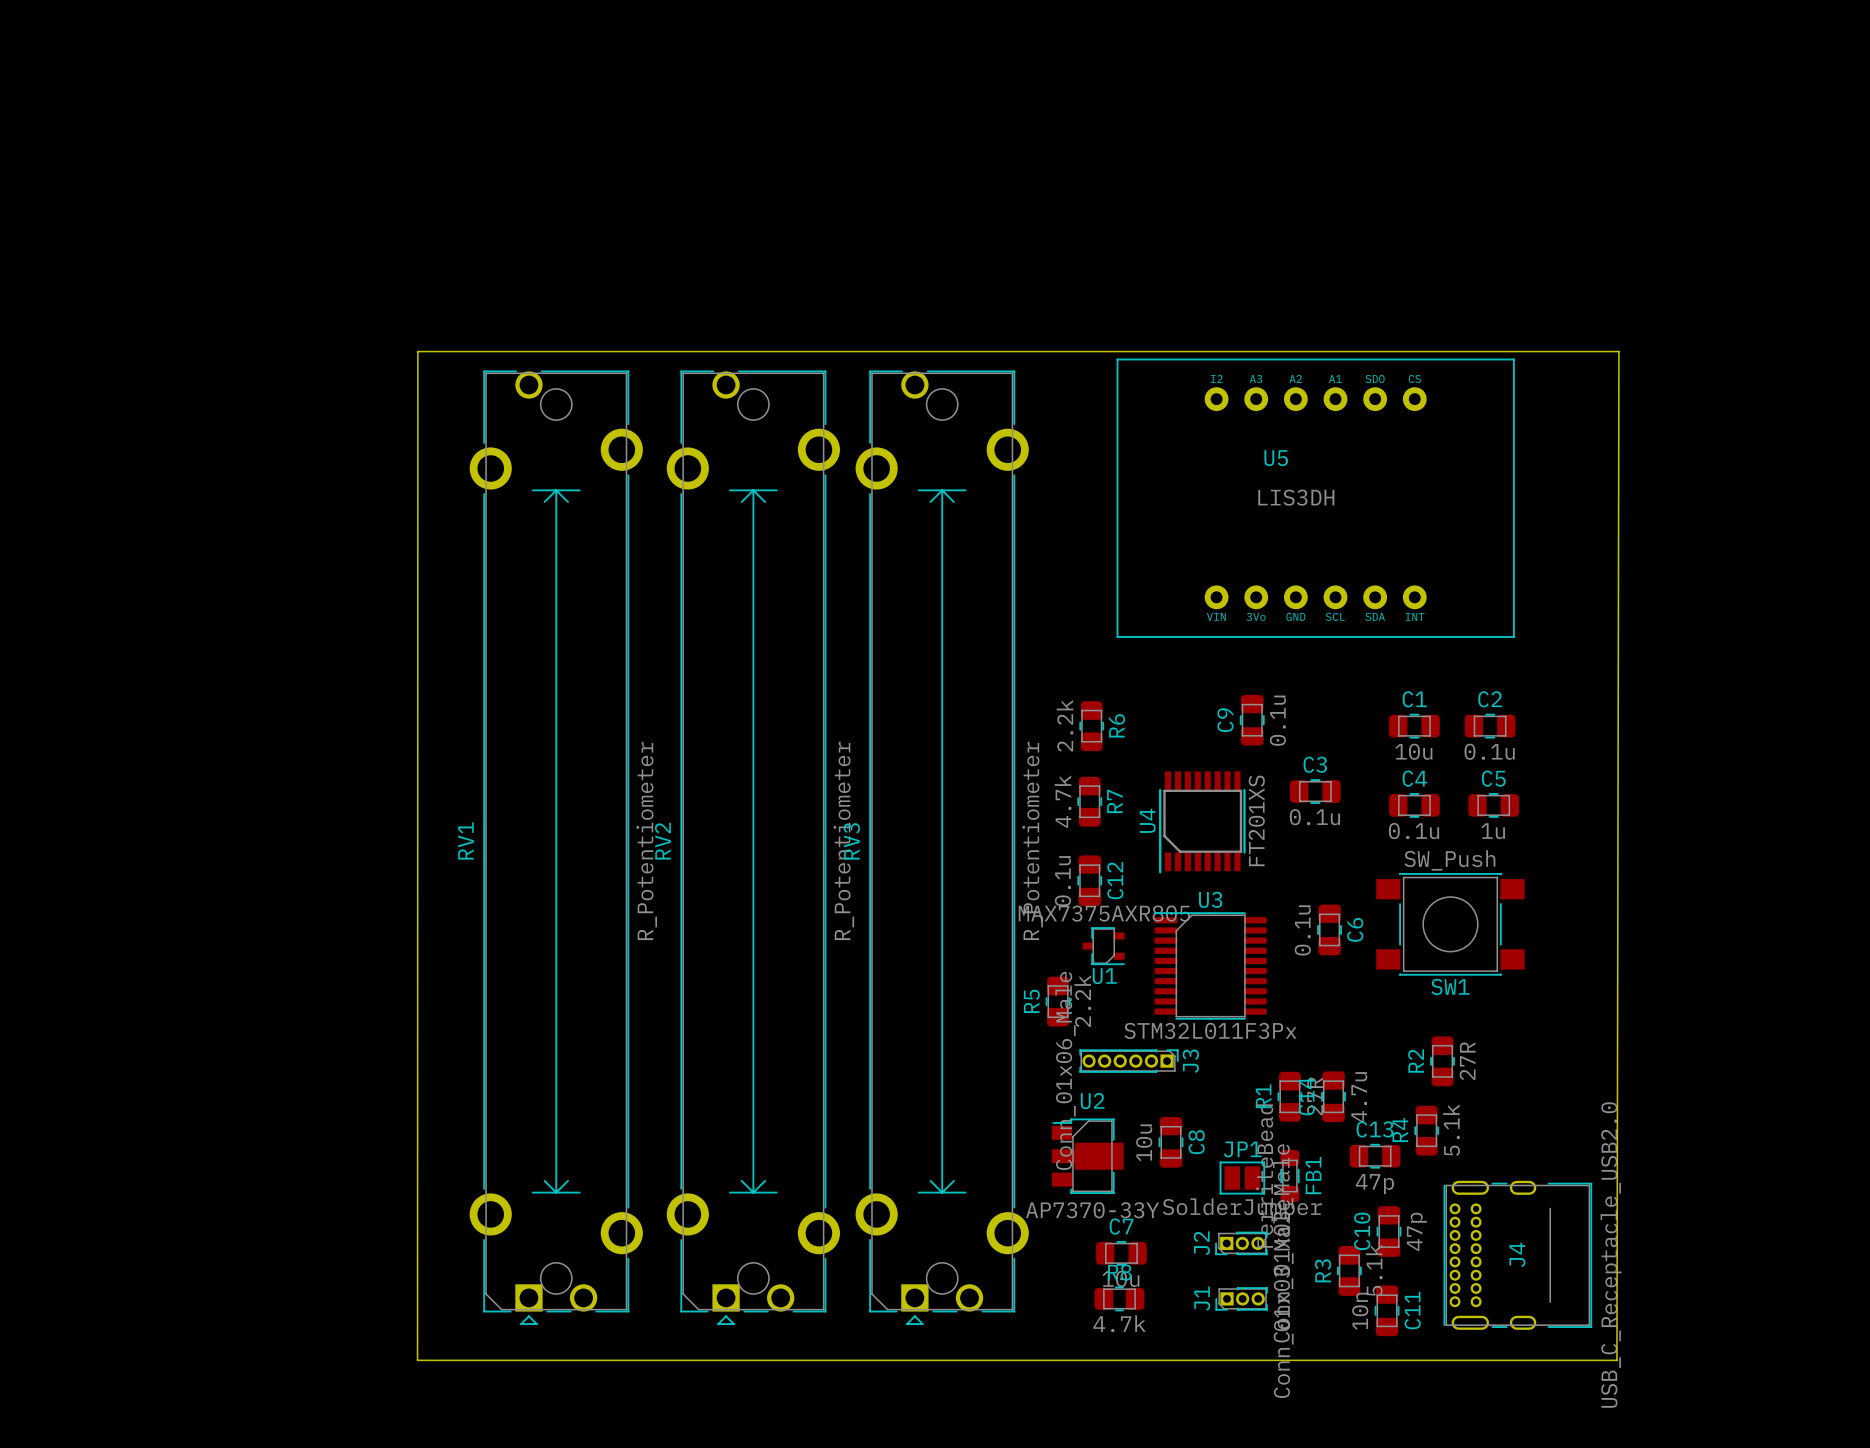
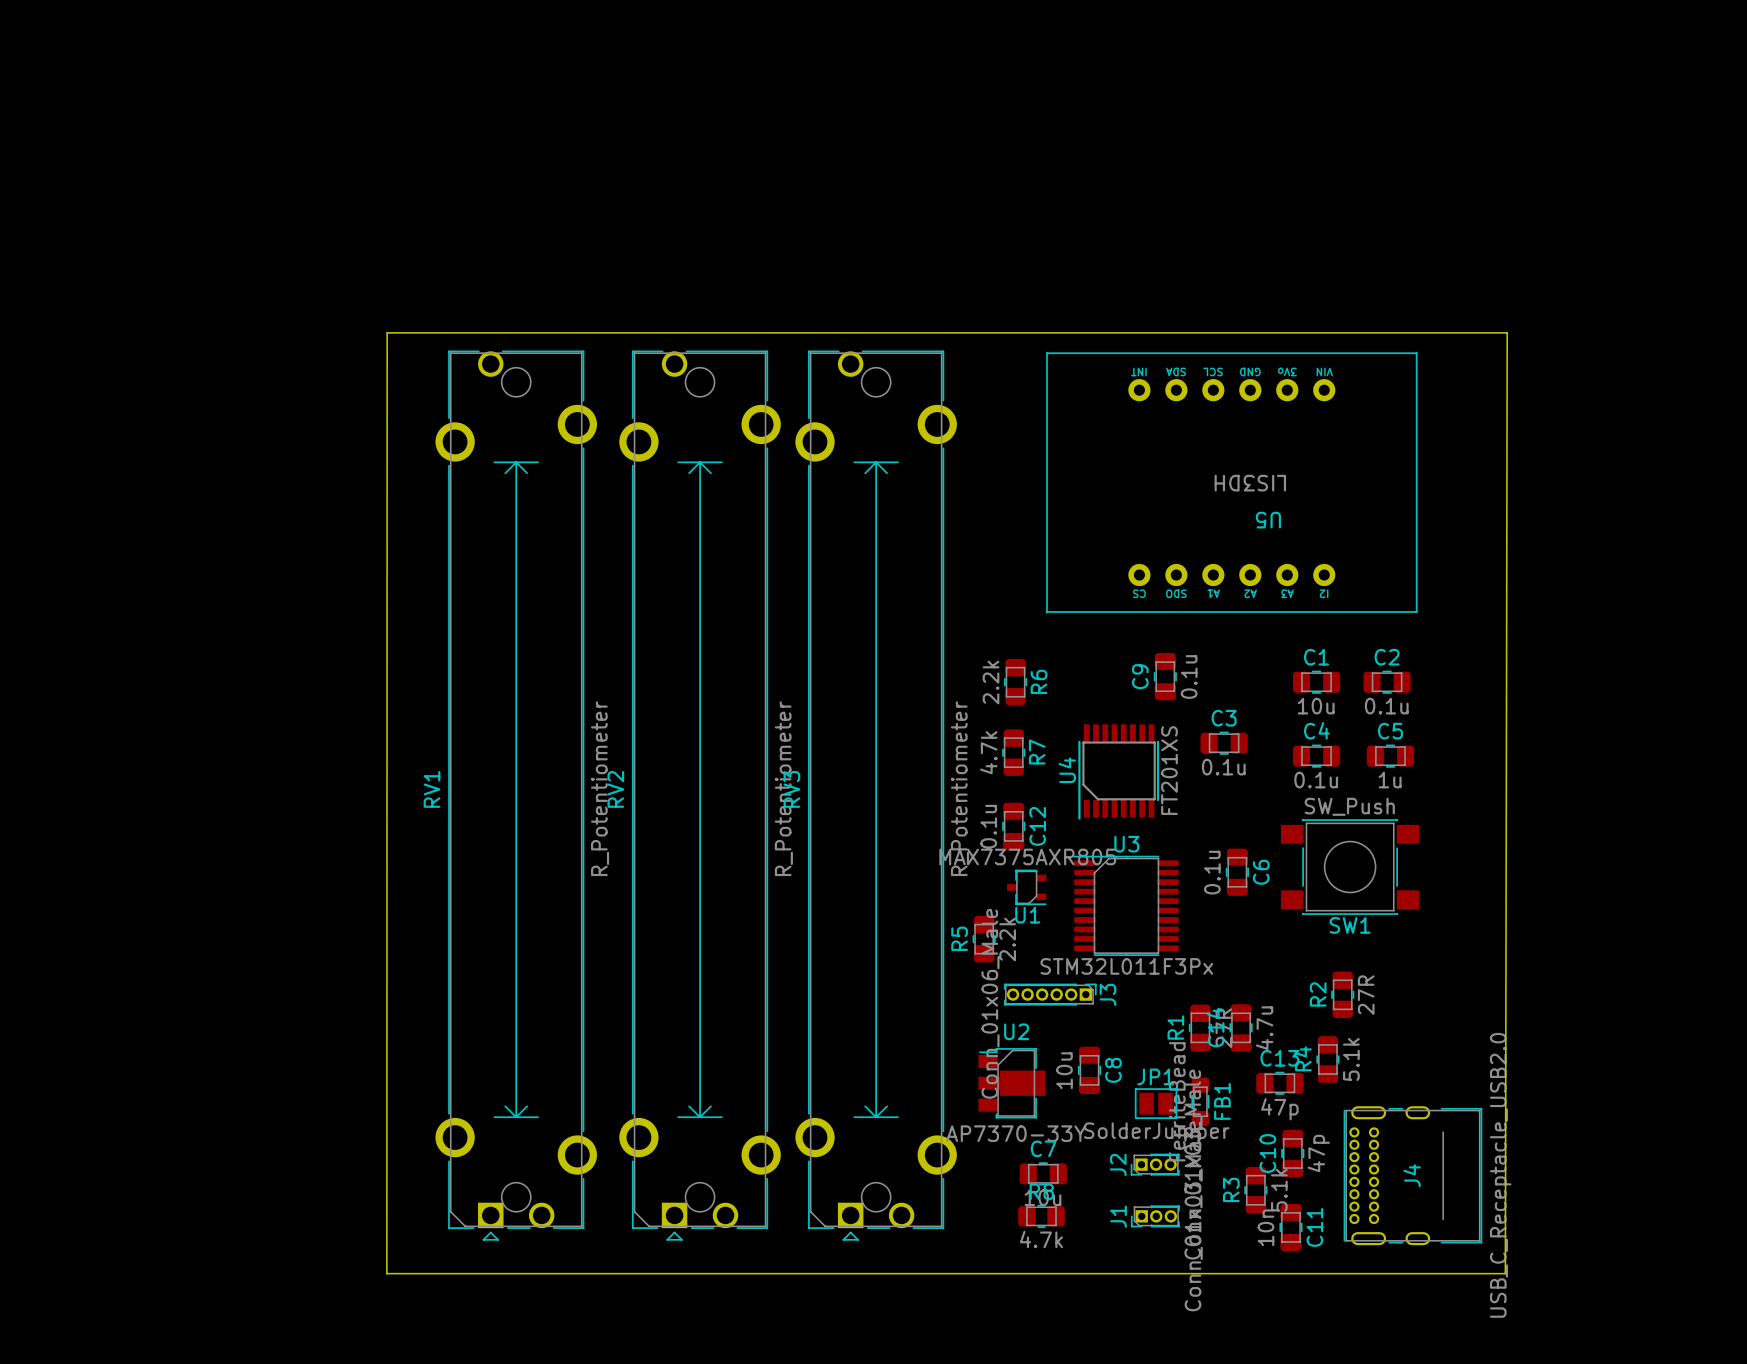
U5 rotation: 0° (1315, 498) -> 180° (1231, 482)

